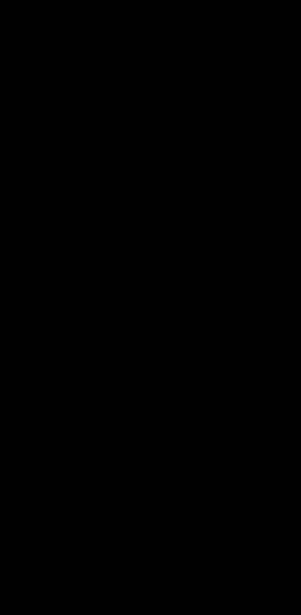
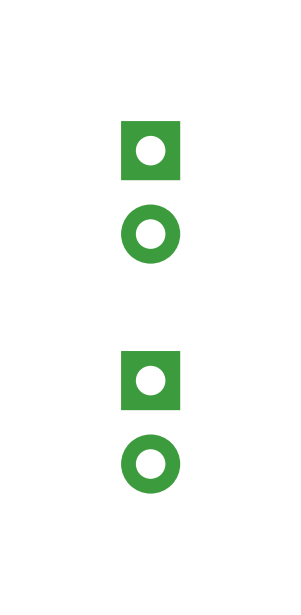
part: none -> (150, 192)
part: none -> (150, 422)

